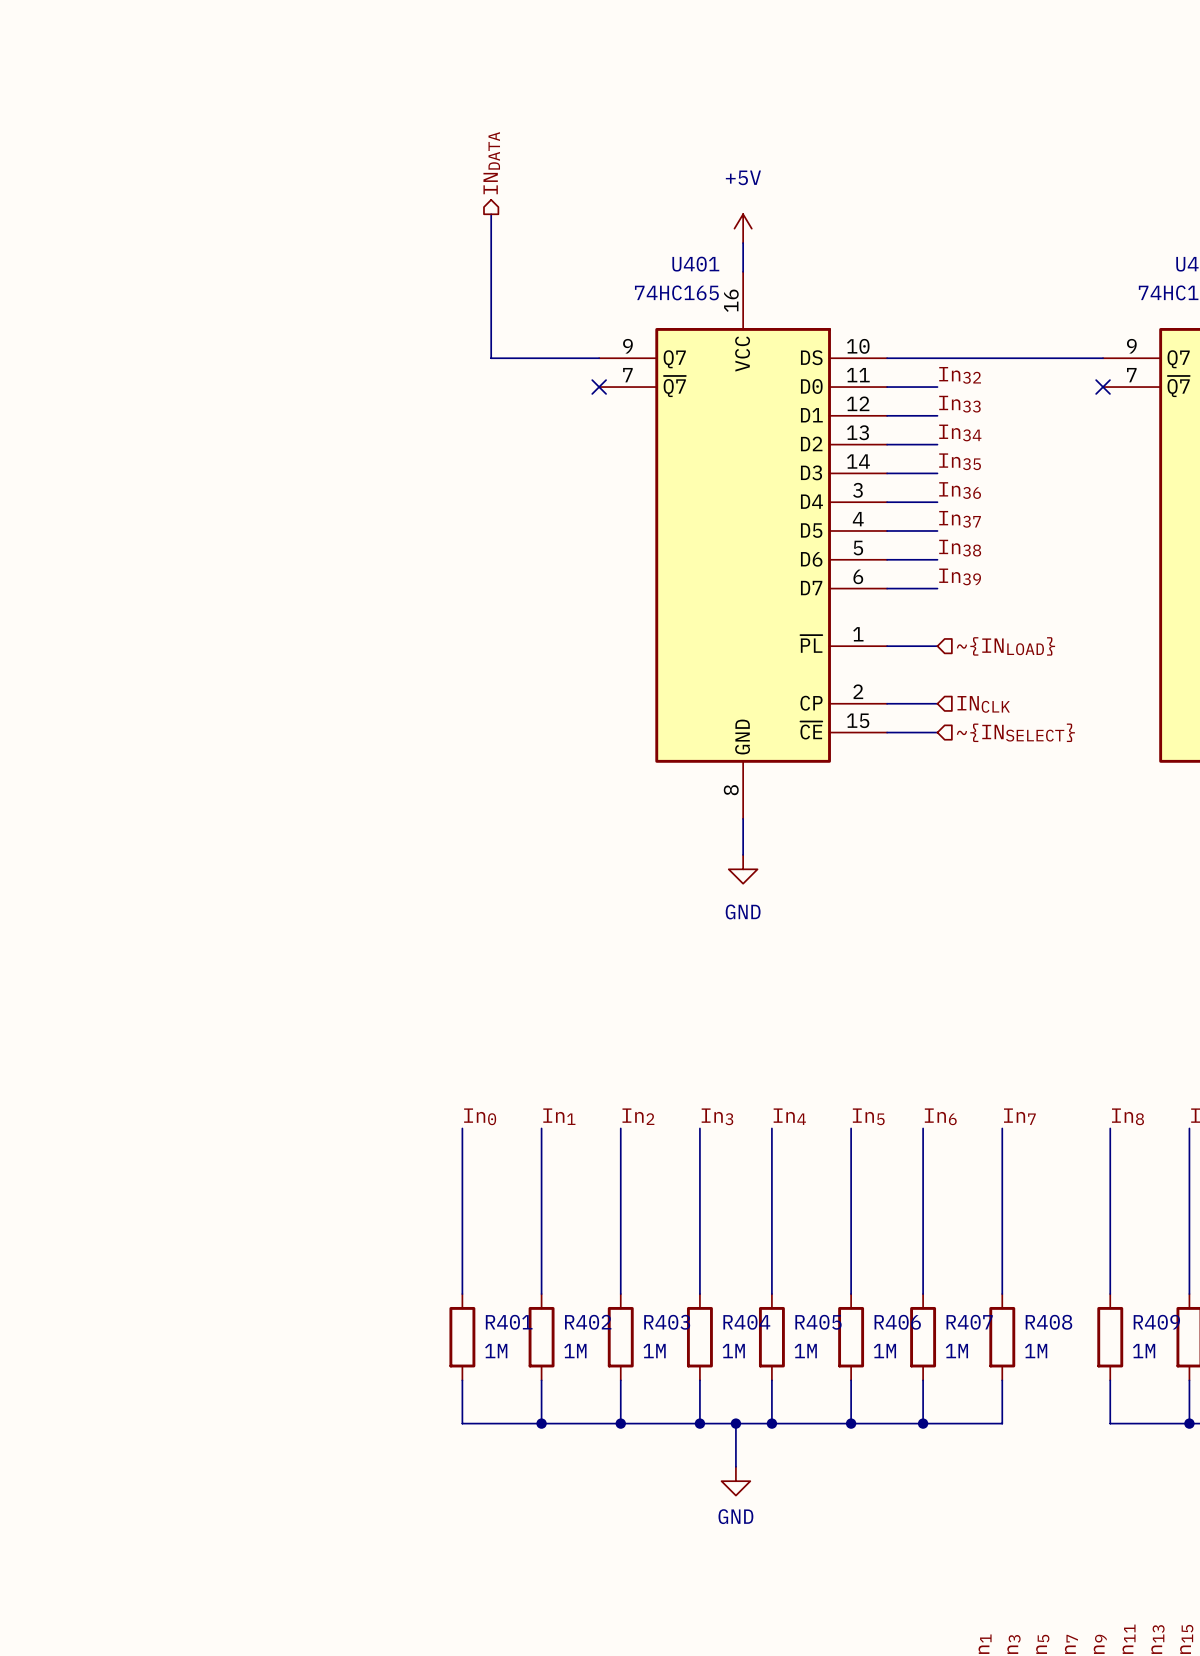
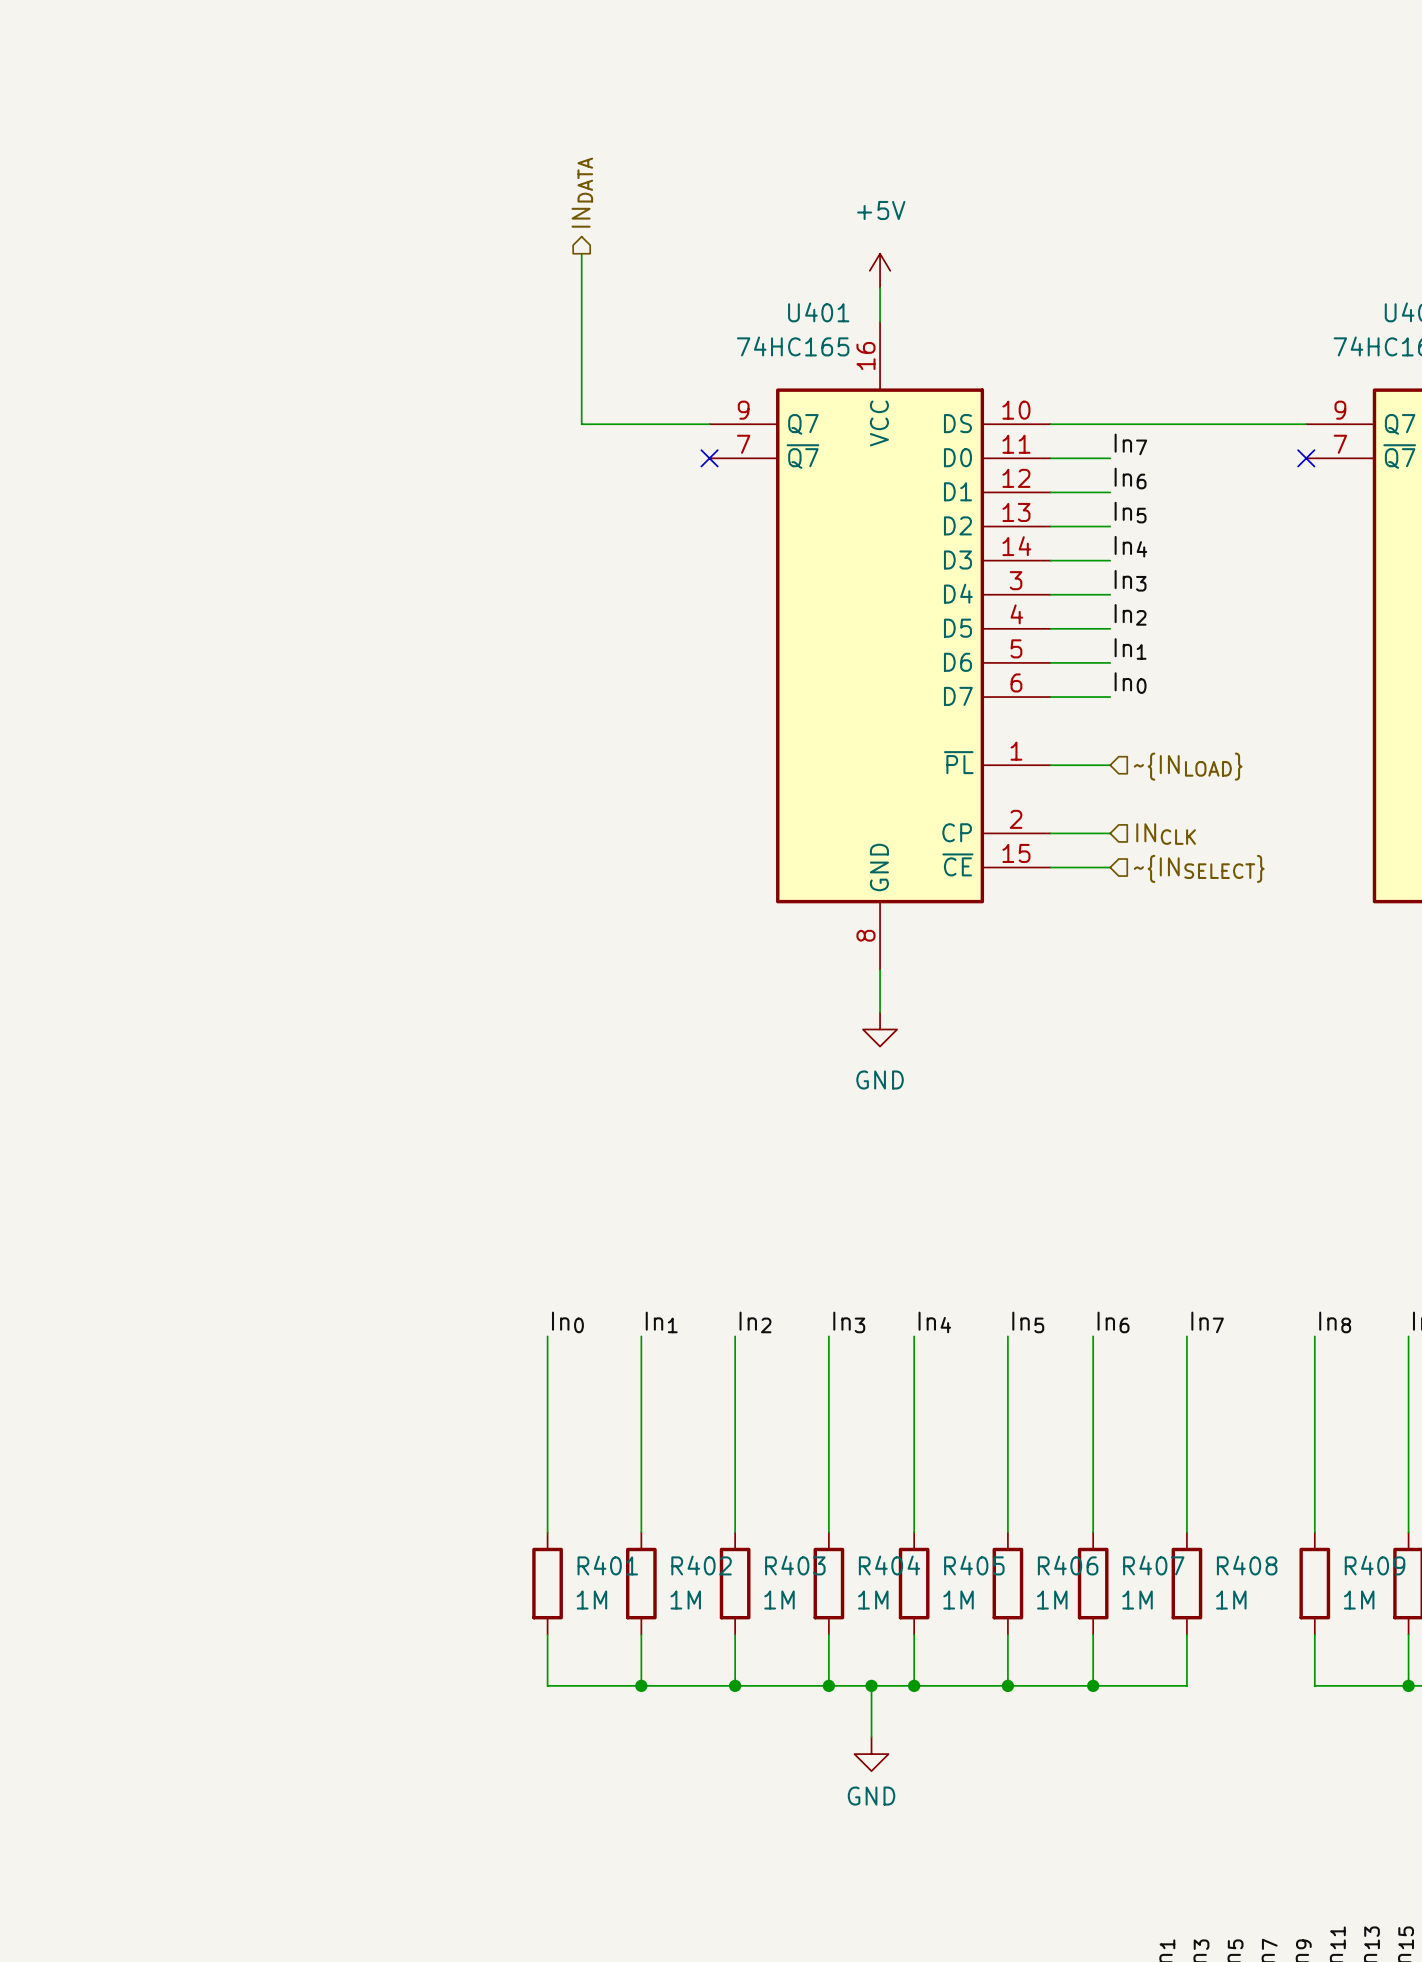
label: In32 (960, 375) -> In7 (1130, 444)
label: In33 (959, 404) -> In6 (1130, 478)
label: In34 (960, 432) -> In5 (1130, 512)
label: In35 (960, 461) -> In4 (1130, 546)
label: In36 (960, 490) -> In3 (1130, 580)
label: In37 (960, 519) -> In2 (1130, 614)
label: In38 (960, 548) -> In1 (1130, 648)
label: In39 (960, 576) -> In0 (1130, 683)

